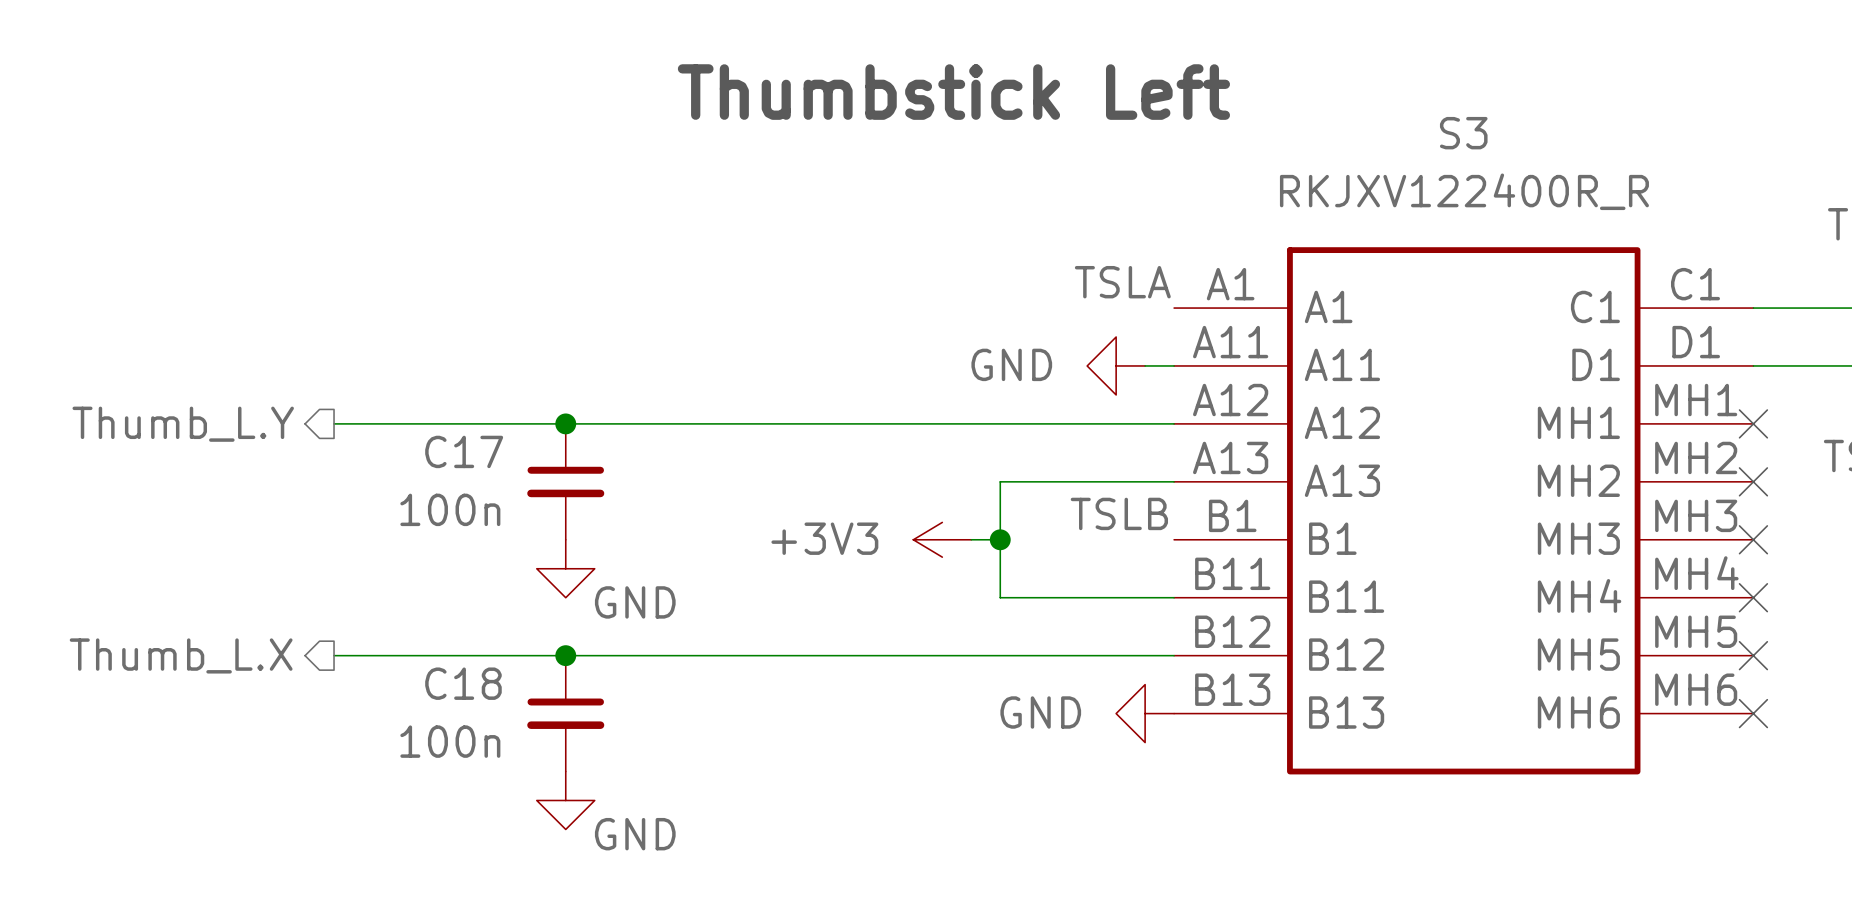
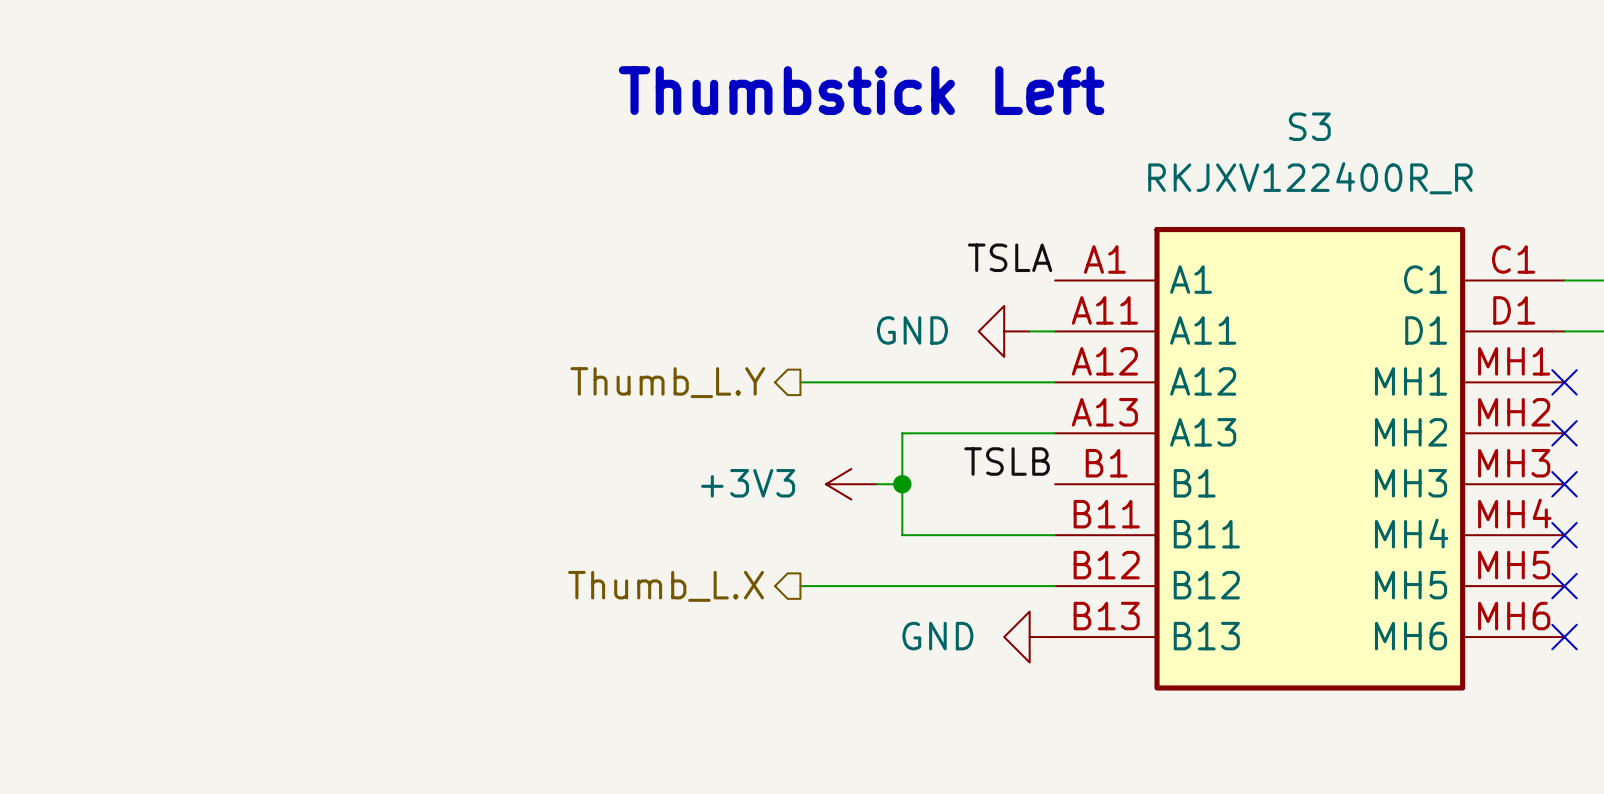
wire: (334, 423) (884, 423) -> none
junction: (565, 423) -> none
hierarchical label position: Thumb_L.Y (183, 424) -> Thumb_L.Y (667, 382)
C17: 100n (565, 481) -> none
power symbol: GND (565, 568) -> none
hierarchical label position: Thumb_L.X (181, 655) -> Thumb_L.X (666, 586)
wire: (334, 655) (884, 655) -> none
junction: (565, 655) -> none
C18: 100n (565, 713) -> none
power symbol: GND (565, 800) -> none

